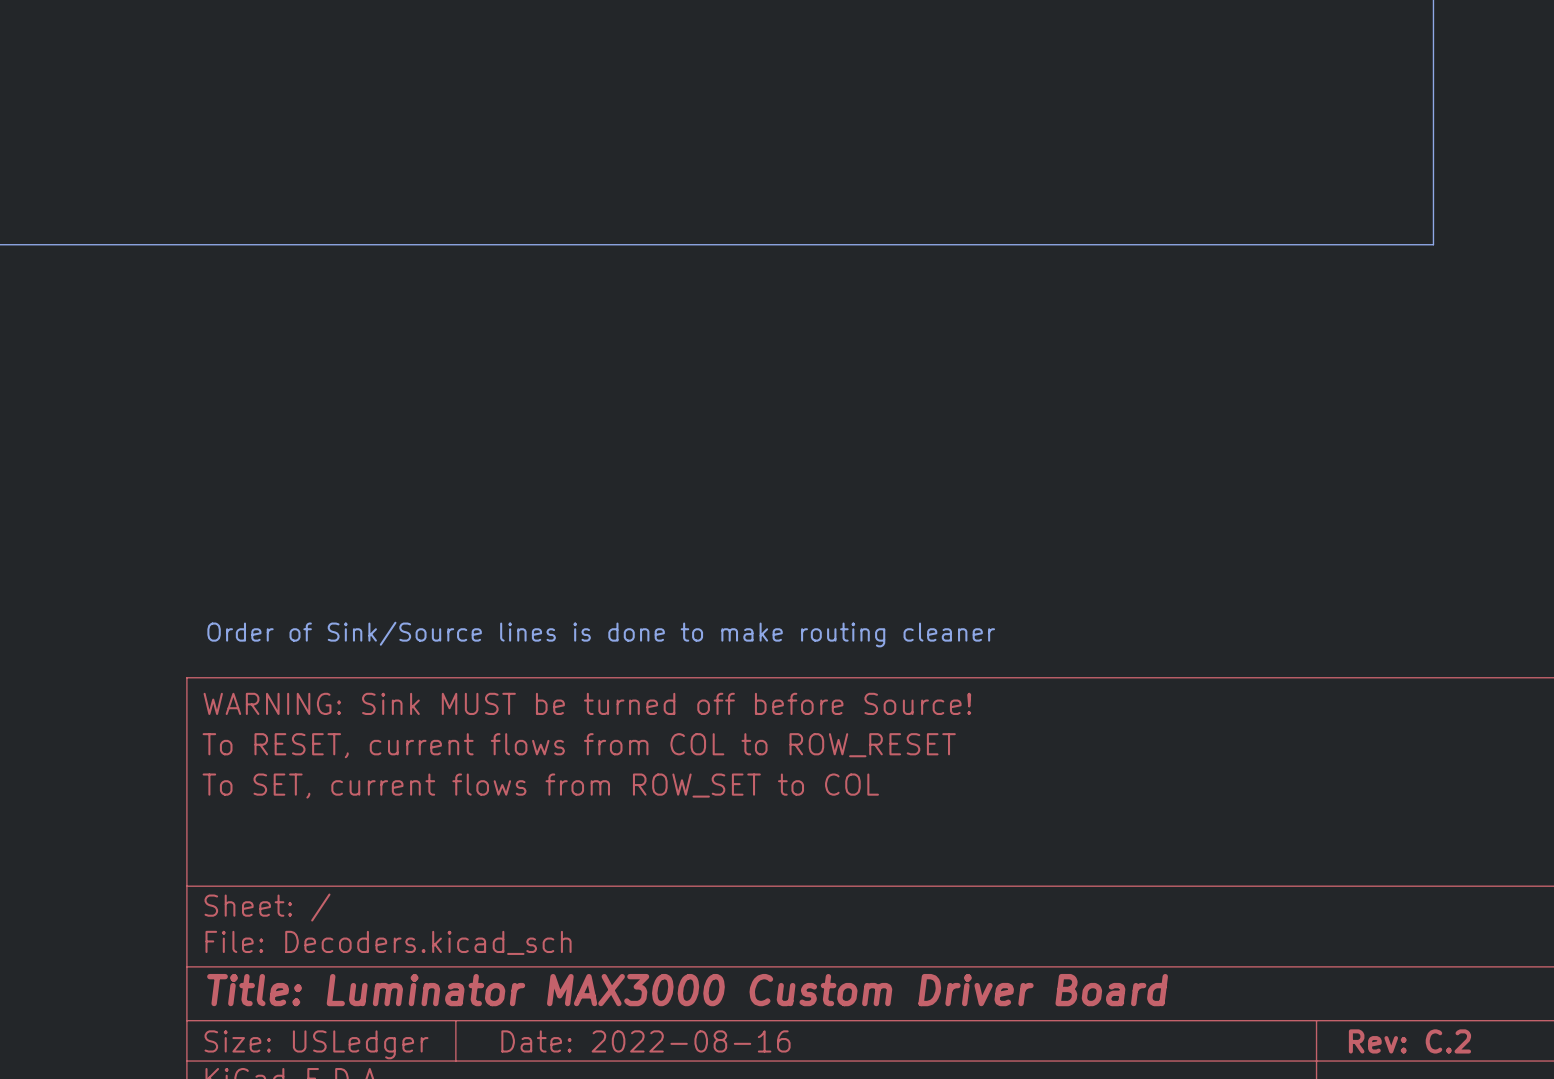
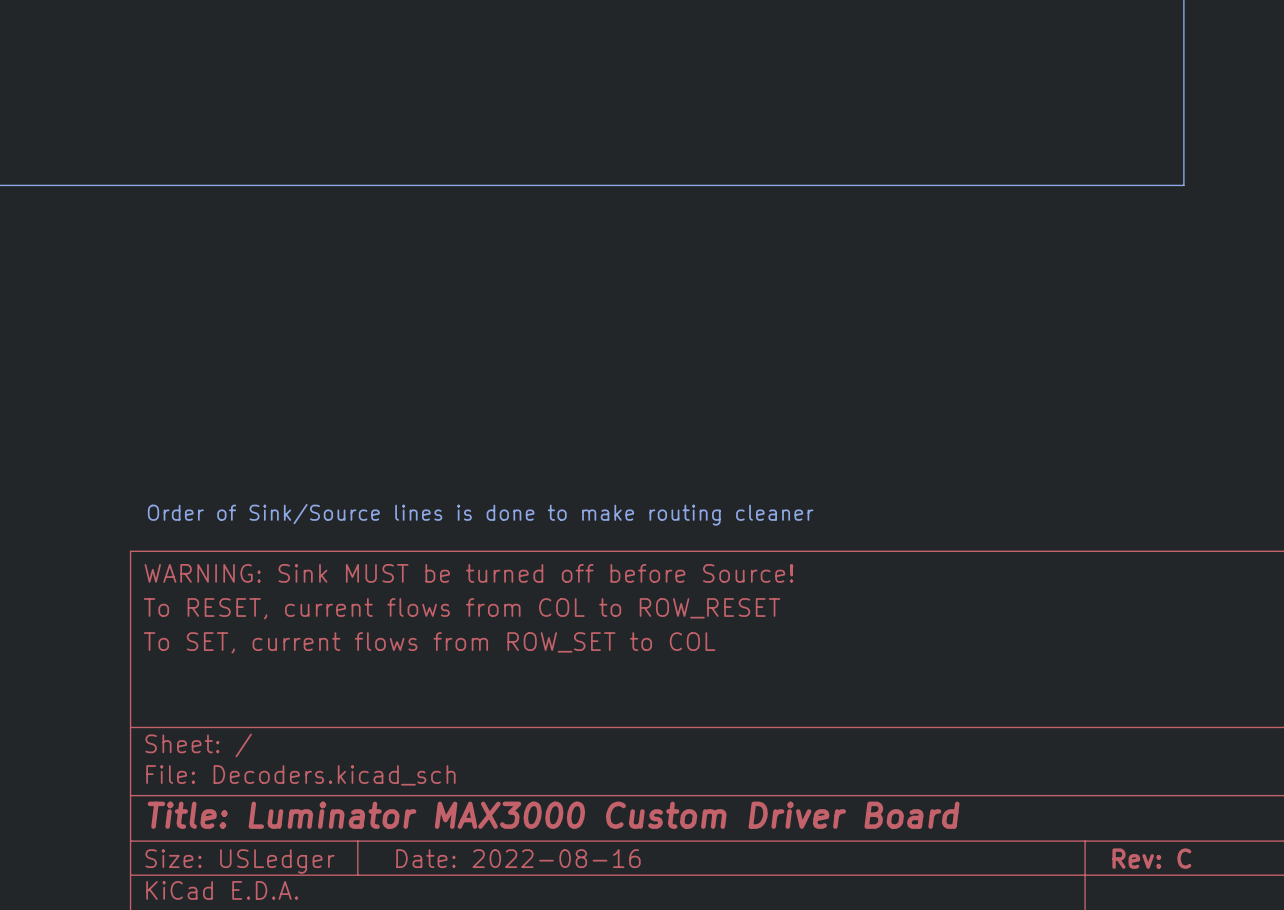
title block: Rev: C.2 (1409, 1041) -> Rev: C (1151, 858)

